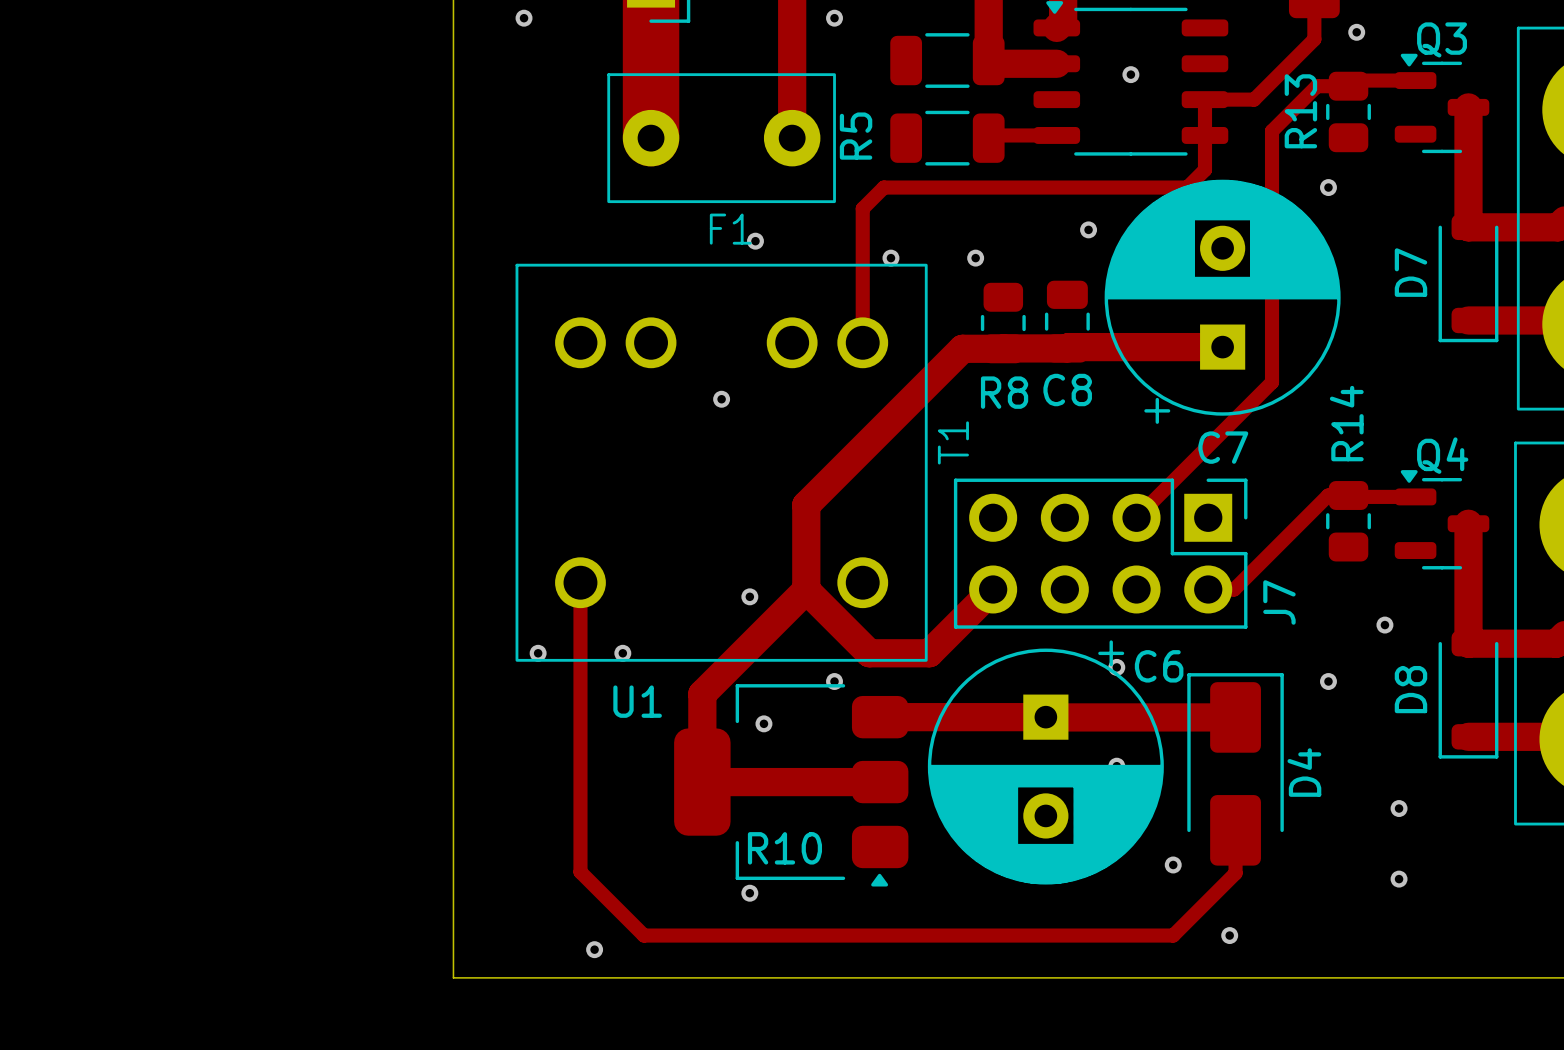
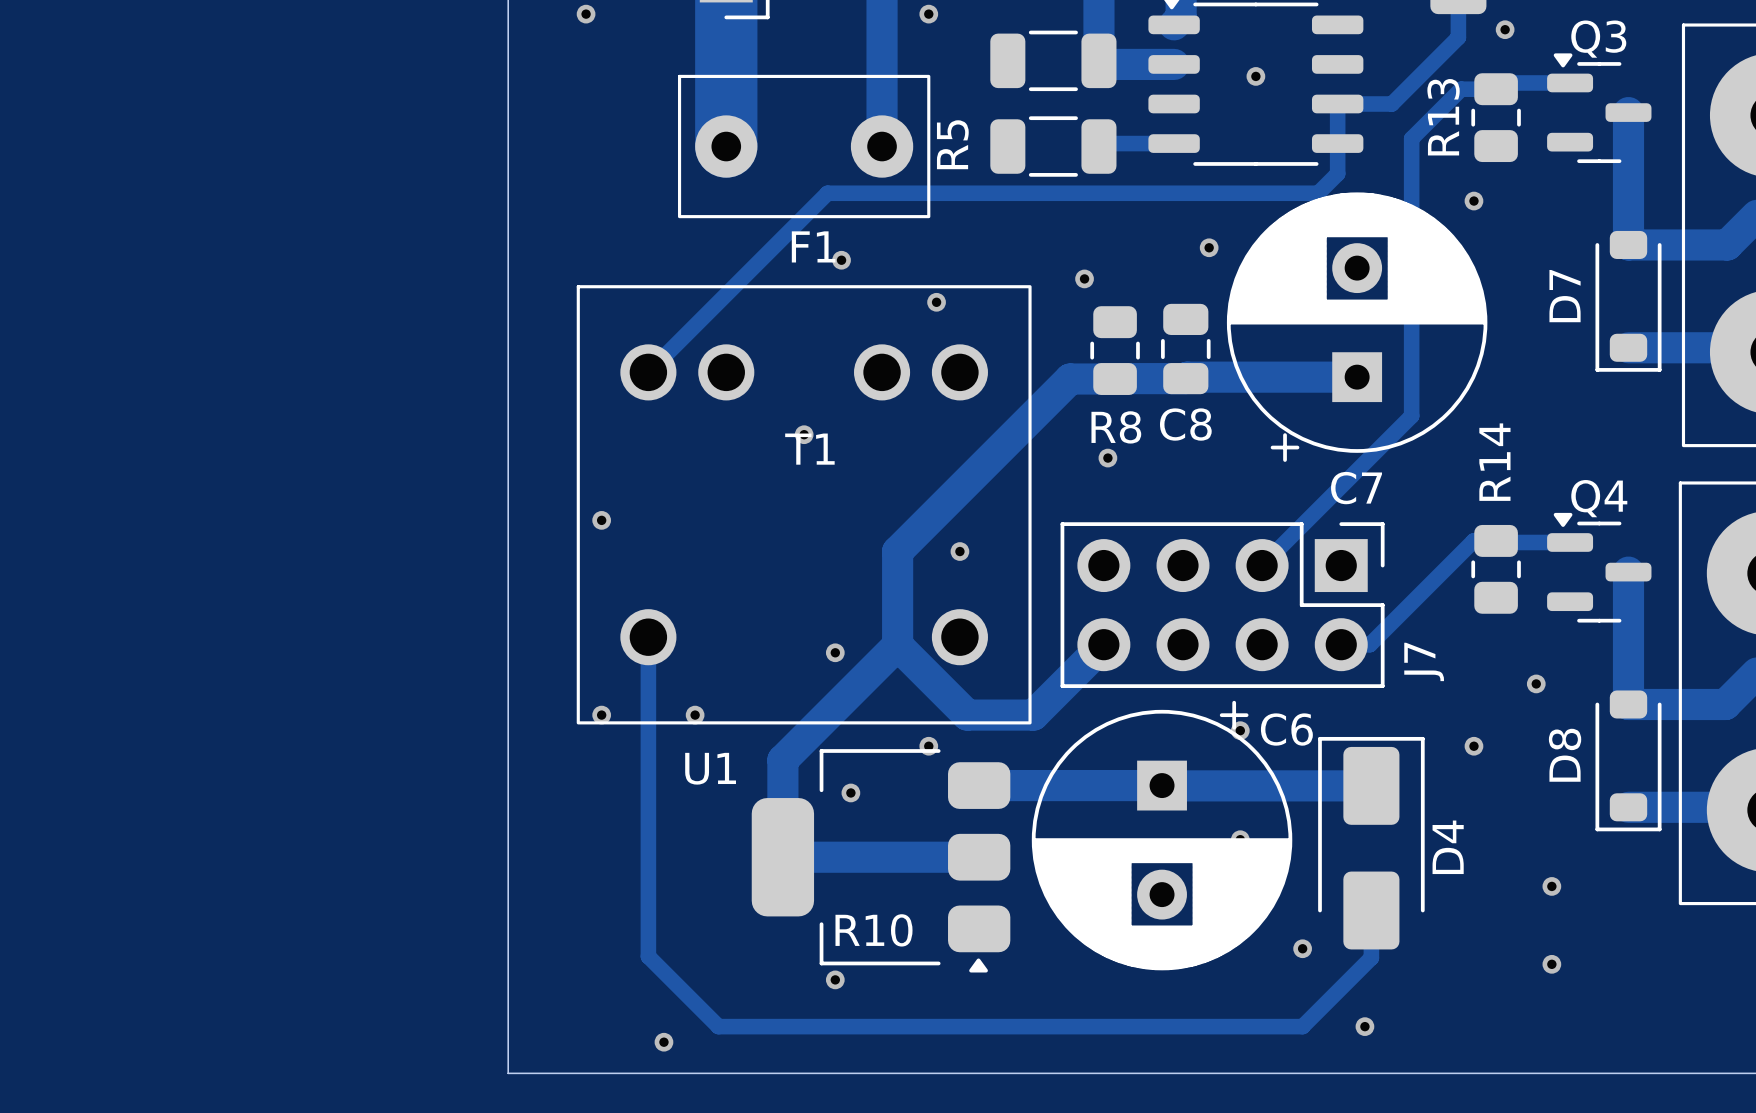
track: (1204, 162) (1204, 169) (1187, 187) (883, 187) (862, 208) (862, 342) -> (1337, 173) (1318, 193) (827, 193) (648, 372)
via position: (890, 258) -> (936, 302)
via: none -> (1107, 458)
T1 name rotation: 0° (953, 442) -> 90° clockwise (809, 449)
T1 name position: T1 (953, 442) -> T1 (809, 449)
via: none -> (601, 520)
via: none -> (959, 551)

